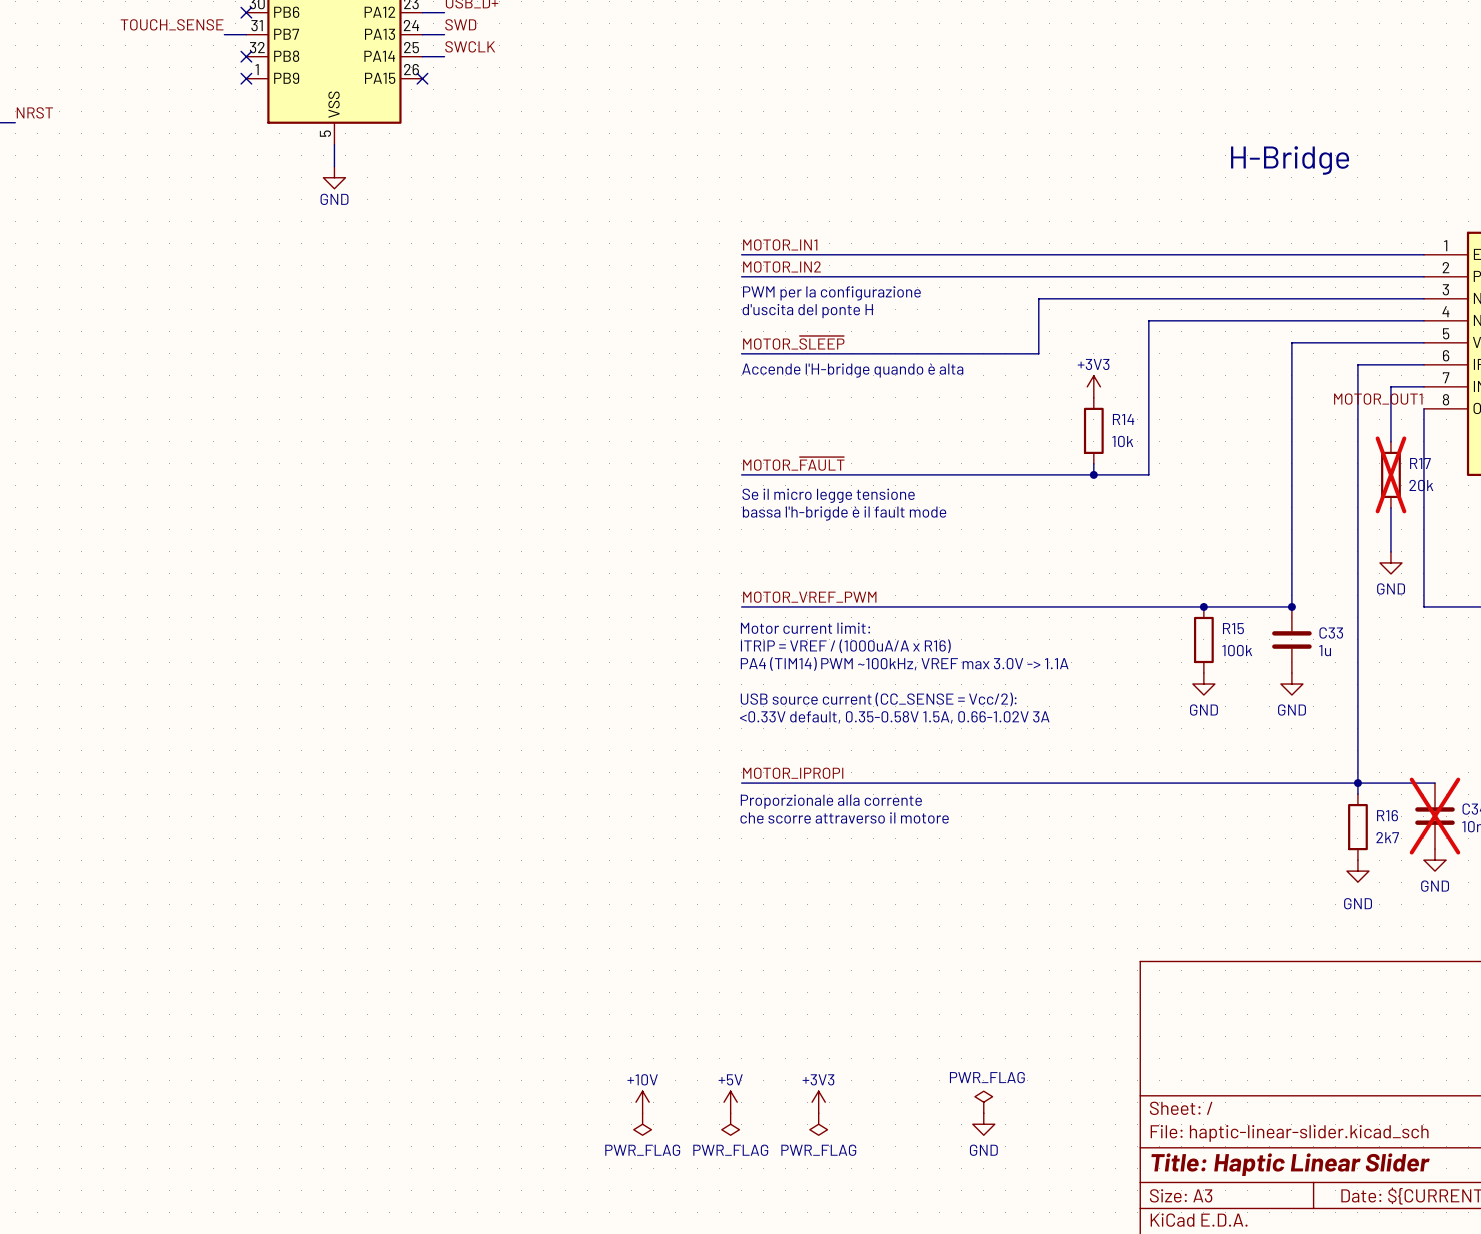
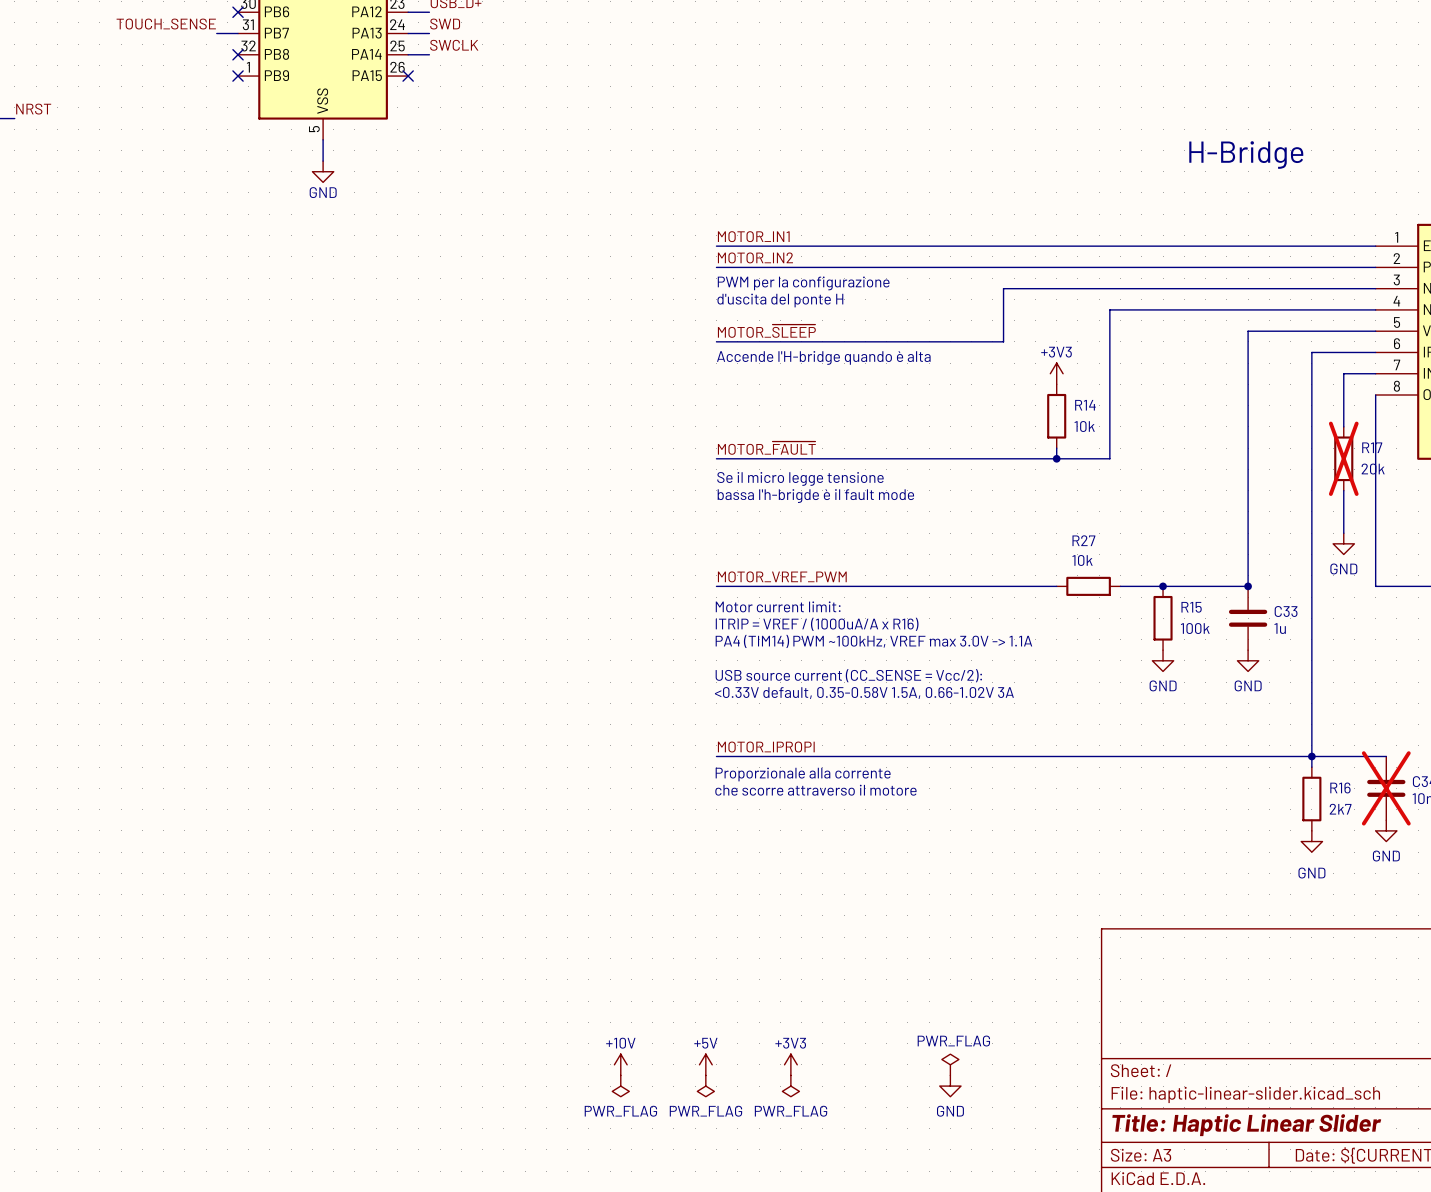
label: MOTOR_OUT1 (1378, 399) -> none
wire: (1093, 606) (1159, 606) -> none
R27: none -> 10k (1088, 586)

